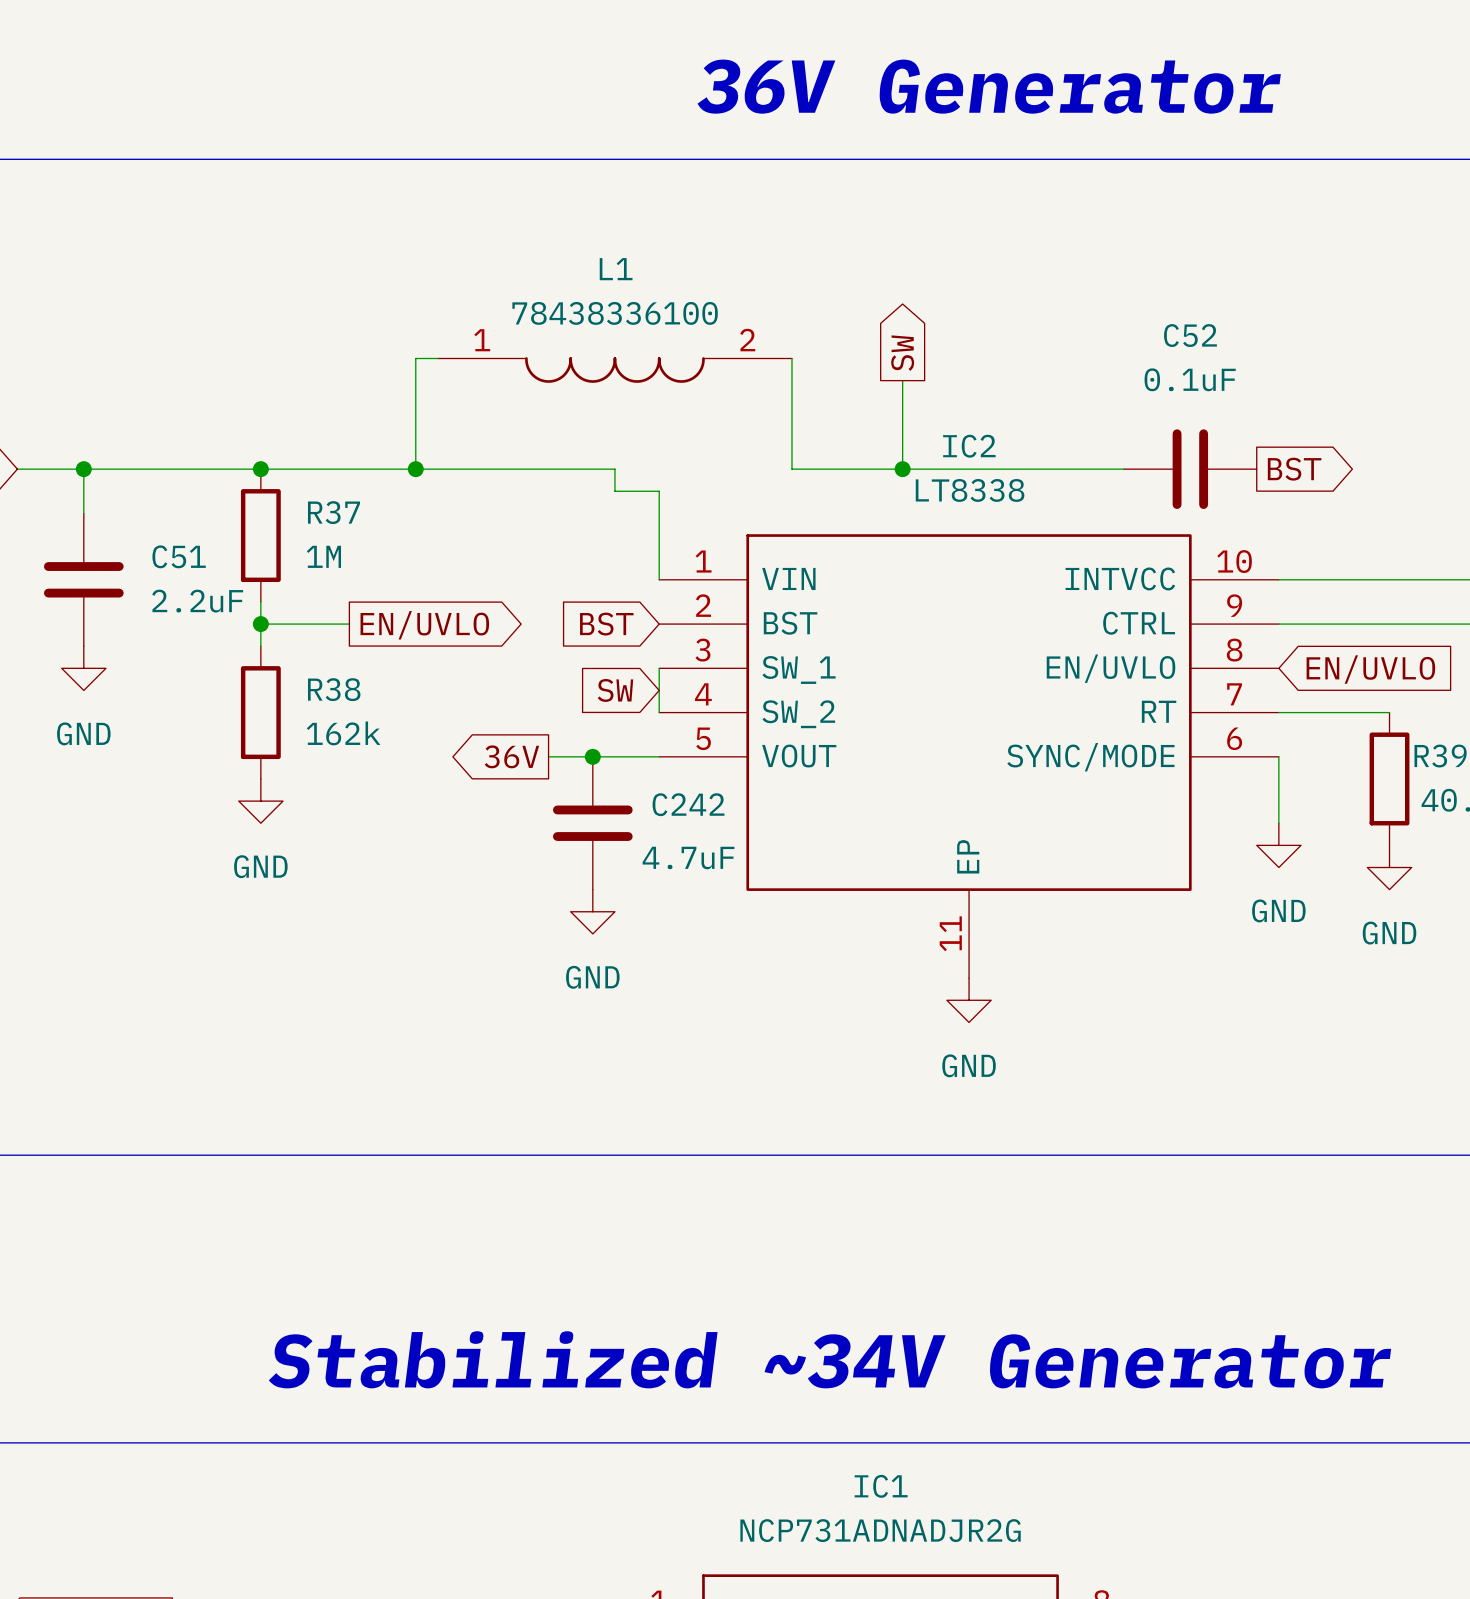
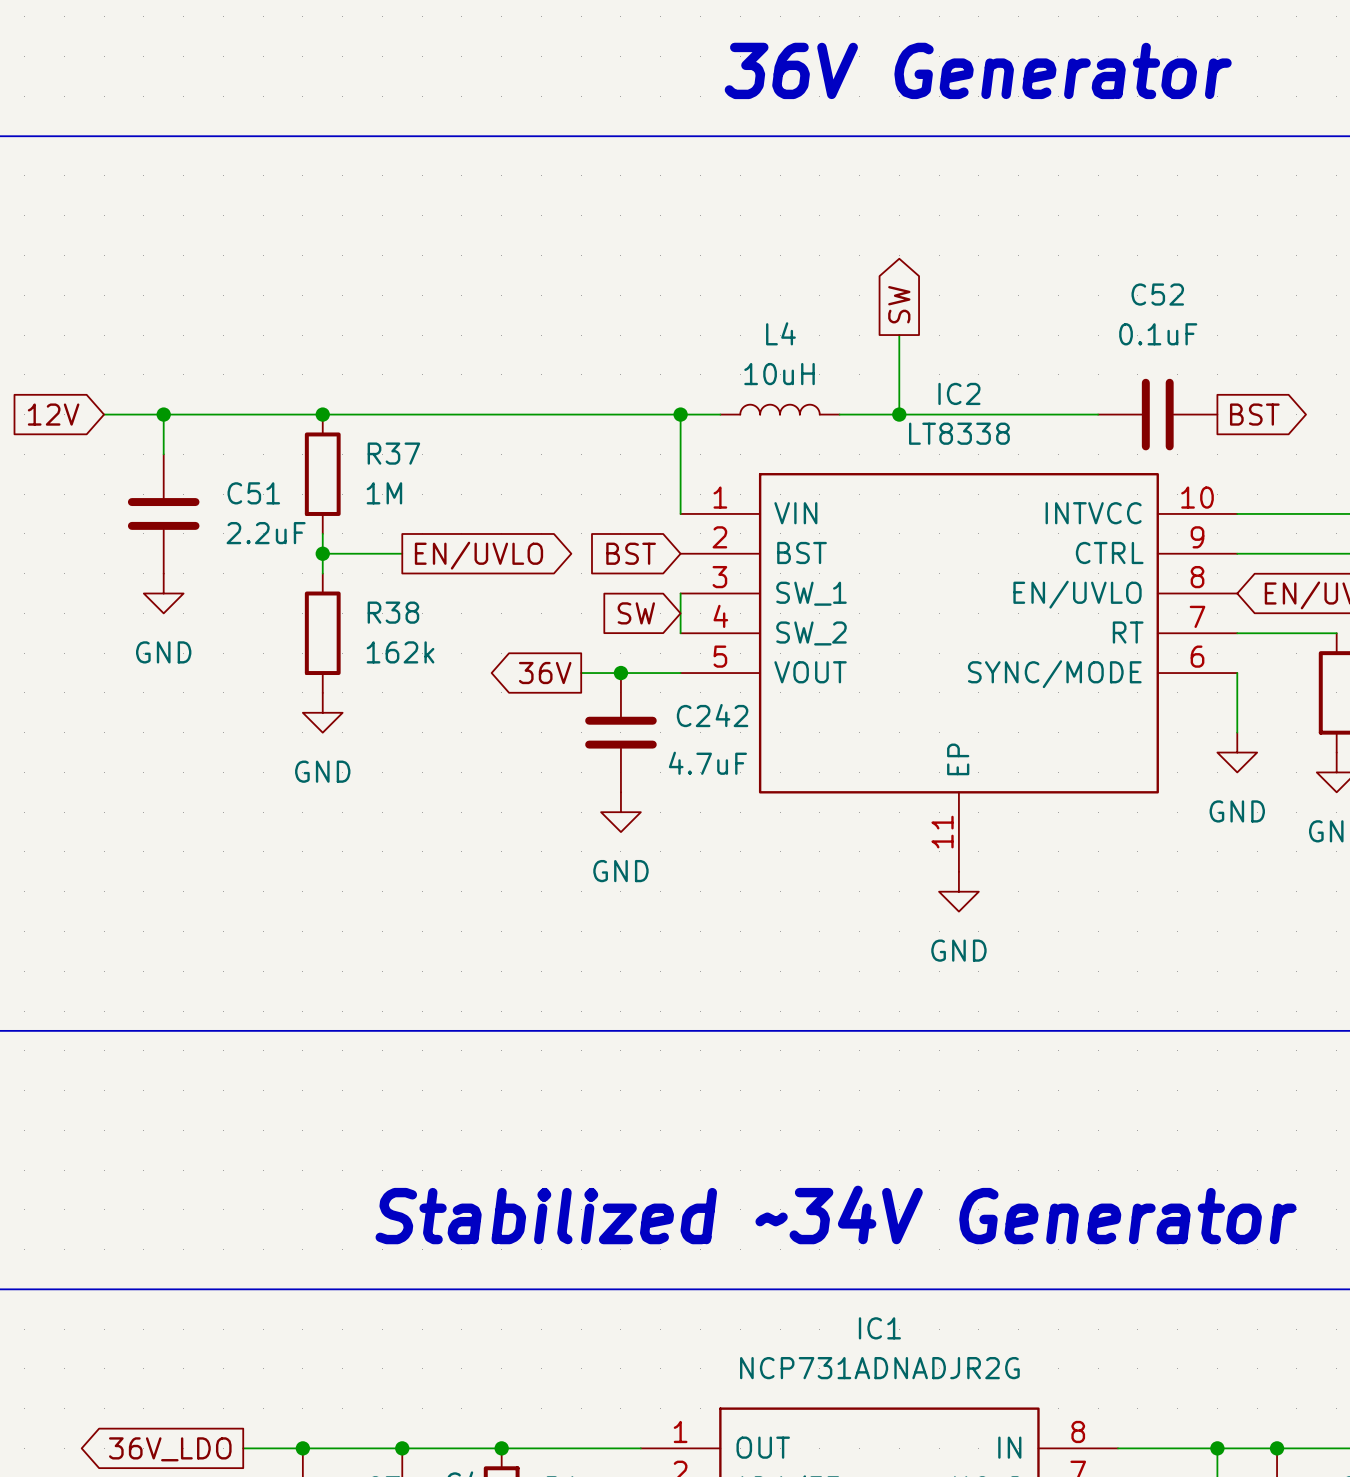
wire: (437, 358) (415, 358) (415, 469) -> none
wire: (791, 358) (791, 469) (836, 469) -> none
L1: 78438336100 (614, 370) -> none
L4: none -> 10uH (780, 409)
junction: (415, 469) -> none
wire: (614, 469) (614, 491) (659, 491) -> (680, 414) (680, 434)
wire: none -> (640, 414) (720, 414)
junction: none -> (680, 414)

